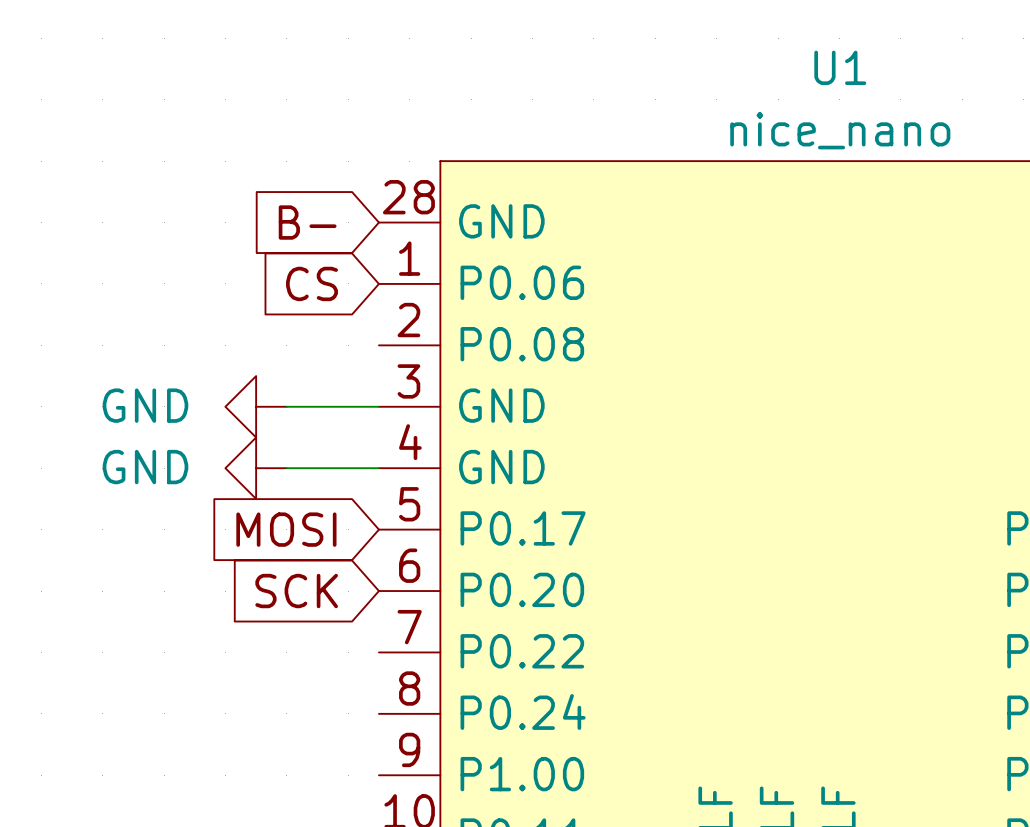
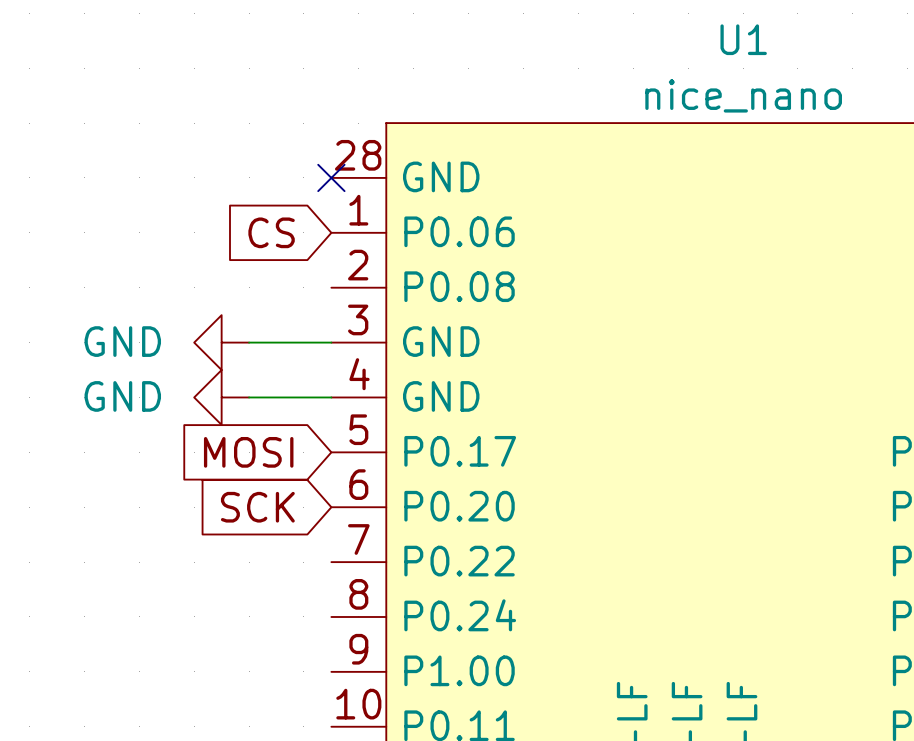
global label: B- (307, 222) -> none
no-connect mark: none -> (331, 177)

